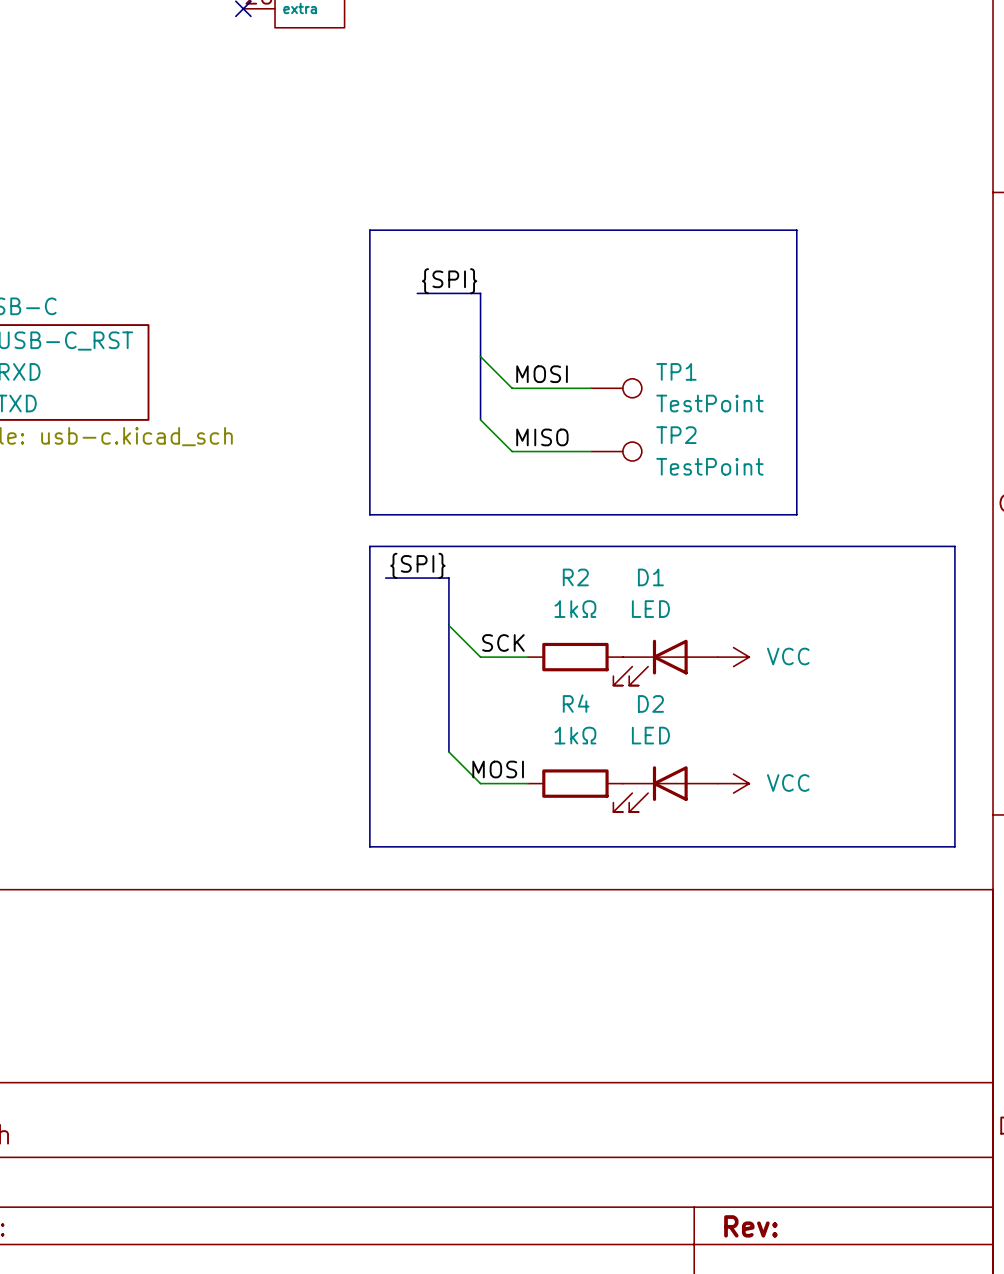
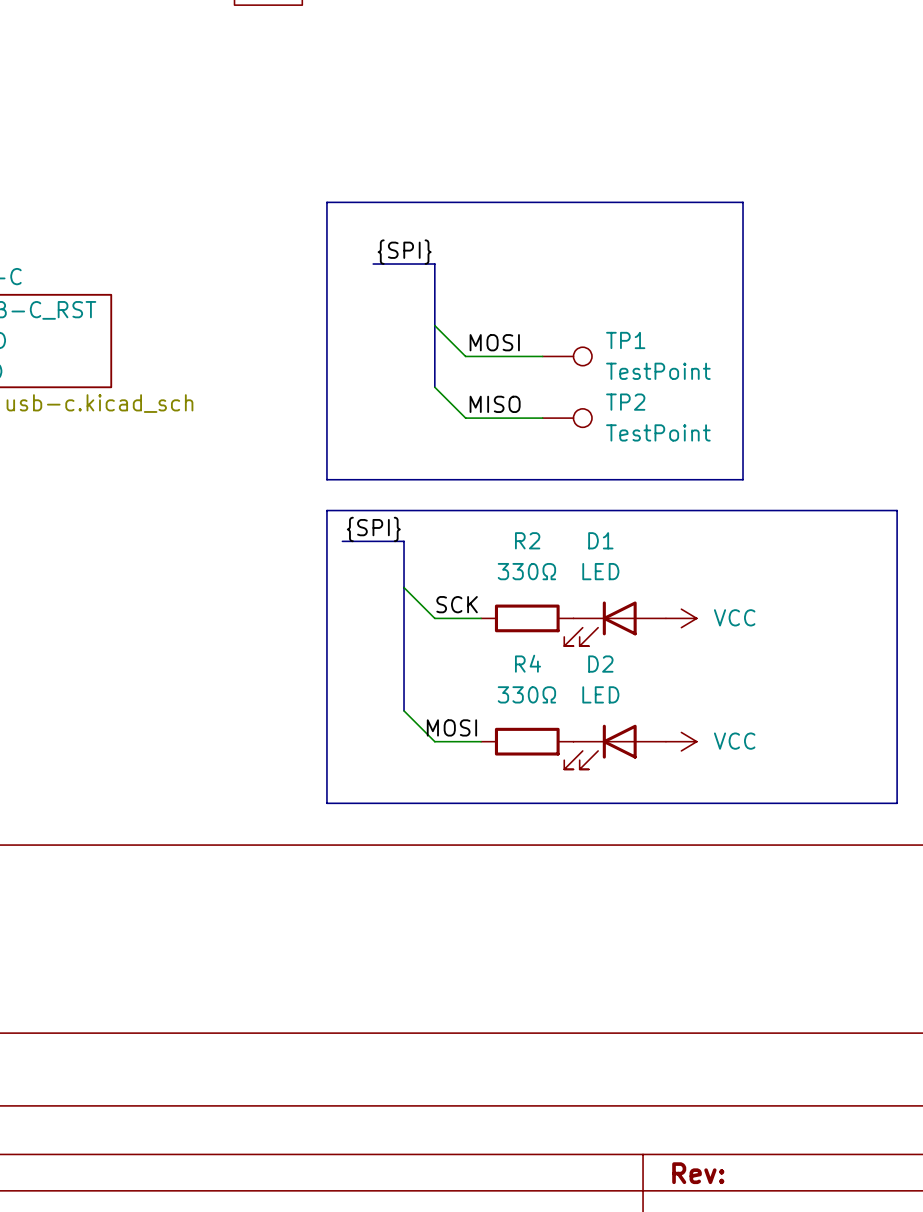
R2 value: 1kΩ (575, 609) -> 330Ω (526, 571)
R4 value: 1kΩ (575, 735) -> 330Ω (526, 694)

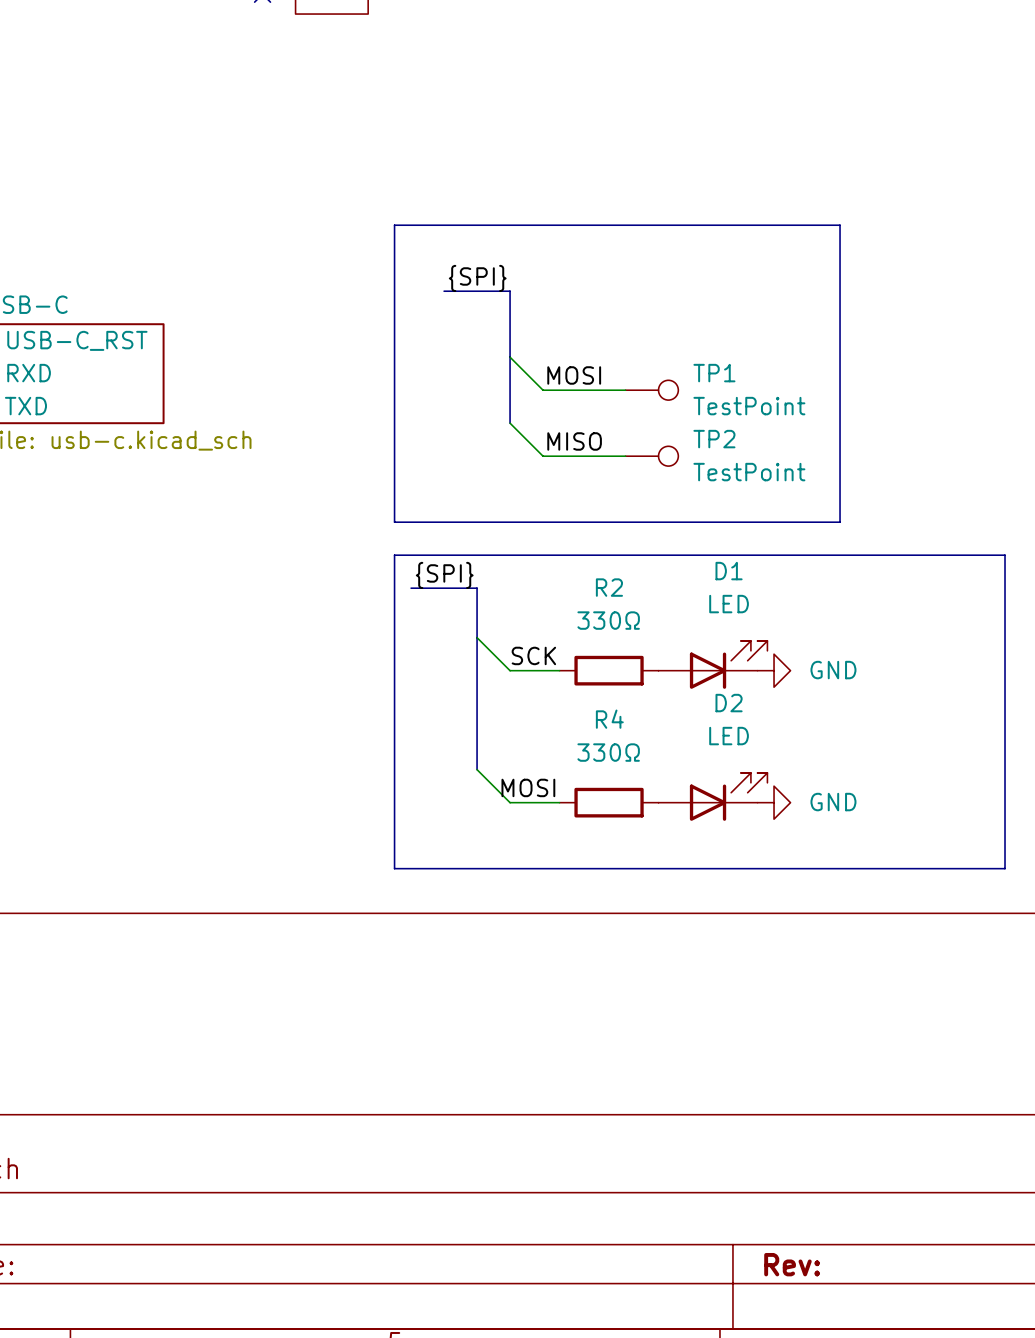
D1 name position: D1 (600, 540) -> D1 (729, 571)
D1 value position: LED (600, 571) -> LED (729, 604)
power symbol: VCC (681, 618) -> GND (774, 670)
D1 rotation: 0° (600, 623) -> 180° (728, 664)
D2 name position: D2 (600, 664) -> D2 (729, 703)
D2 value position: LED (600, 694) -> LED (729, 736)
power symbol: VCC (681, 741) -> GND (774, 802)
D2 rotation: 0° (600, 747) -> 180° (728, 796)

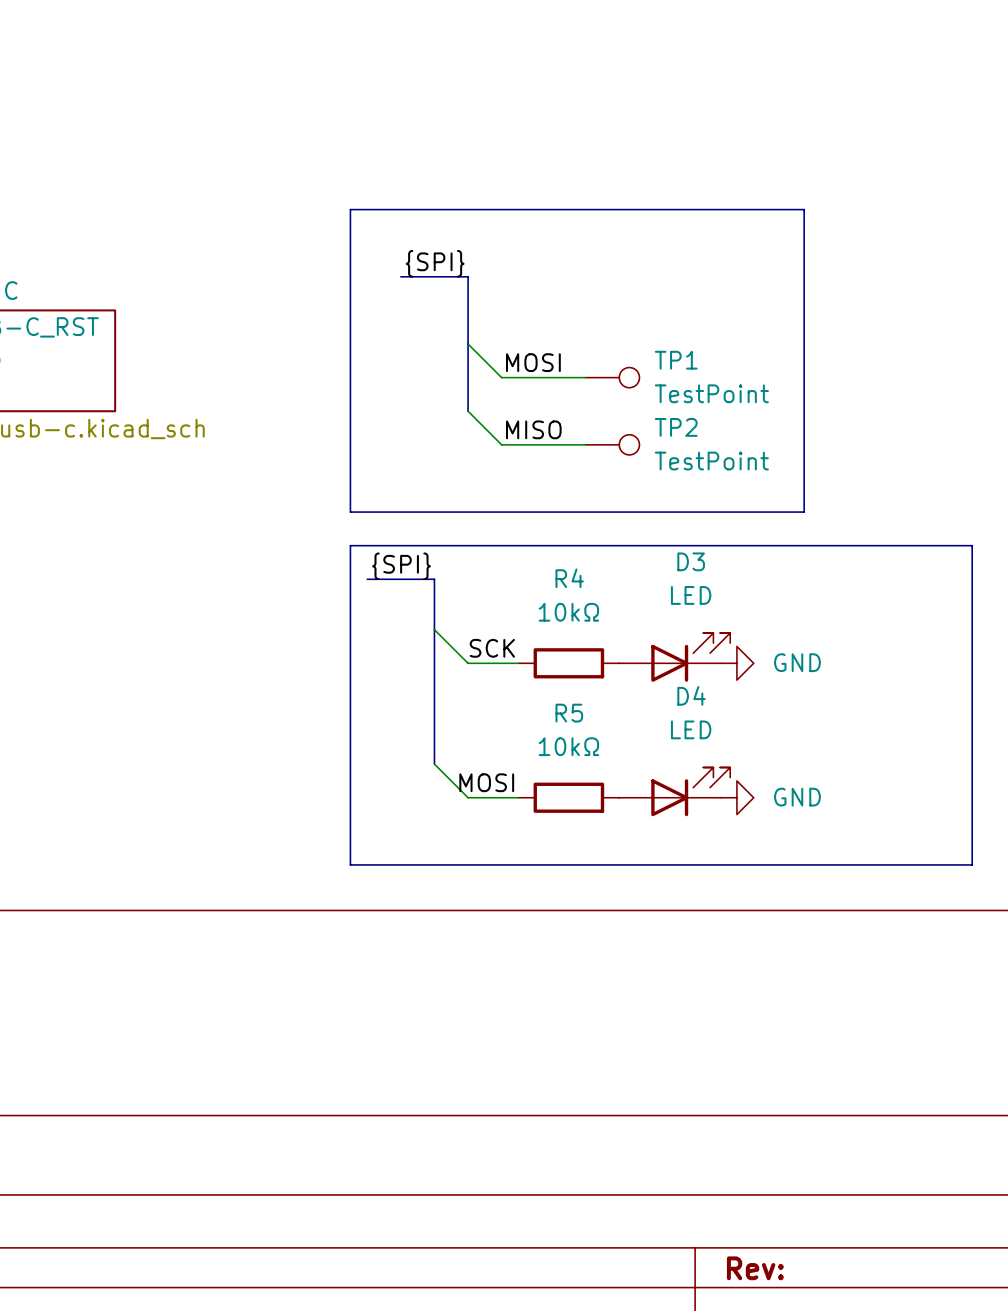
D1 name: D1 (729, 571) -> D3 (691, 561)
R2 name: R2 (609, 587) -> R4 (569, 578)
R2 value: 330Ω (608, 620) -> 10kΩ (568, 612)
D2 name: D2 (729, 703) -> D4 (691, 695)
R4 name: R4 (609, 719) -> R5 (569, 713)
R4 value: 330Ω (608, 752) -> 10kΩ (568, 746)

